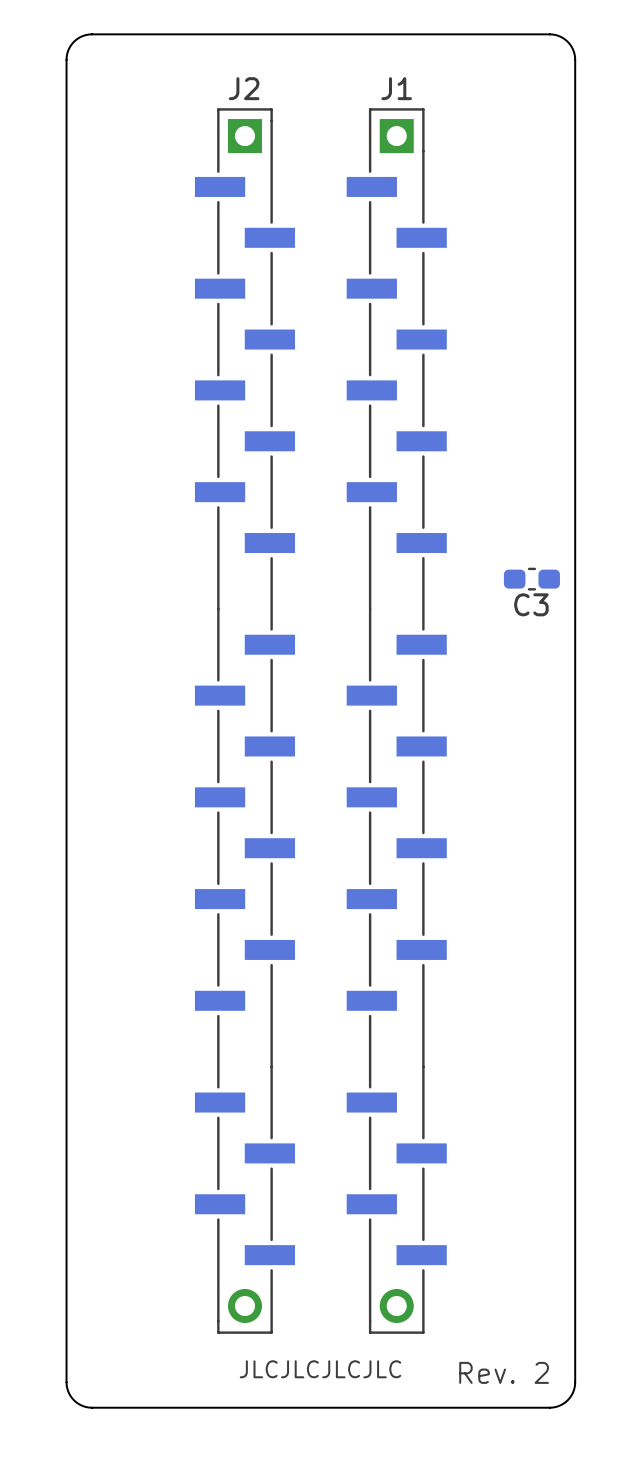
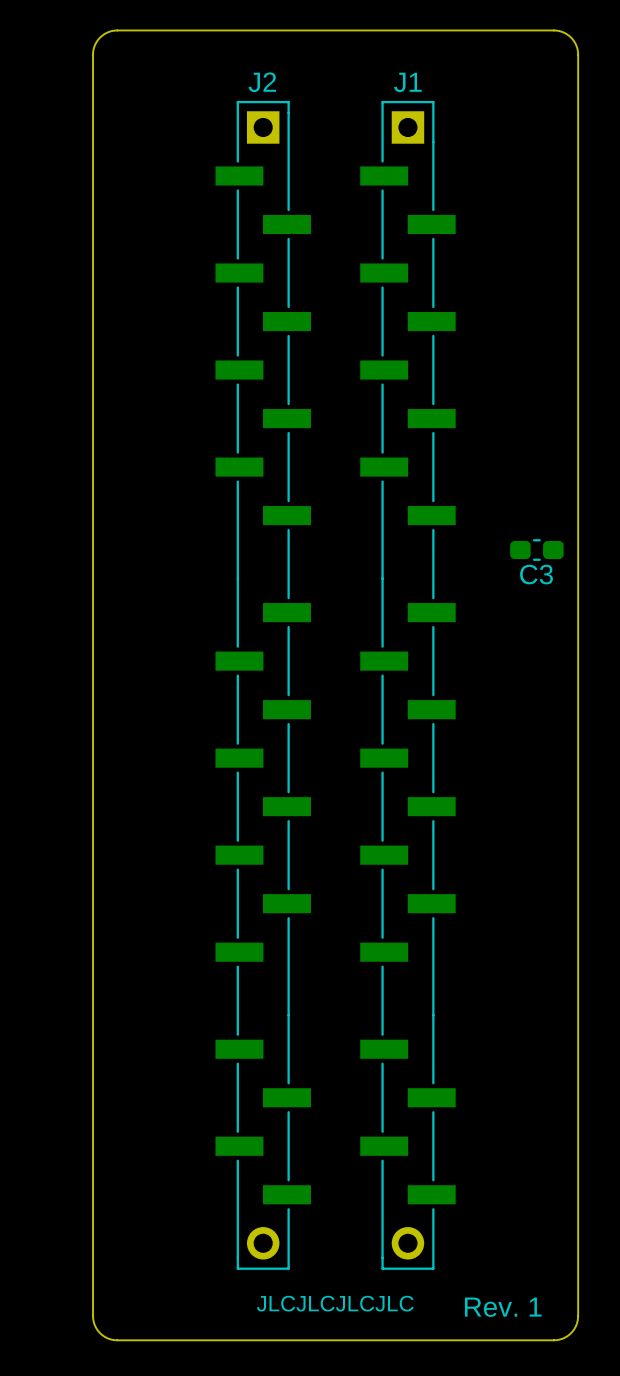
text: Rev. 2 (504, 1372) -> Rev. 1 (503, 1307)

